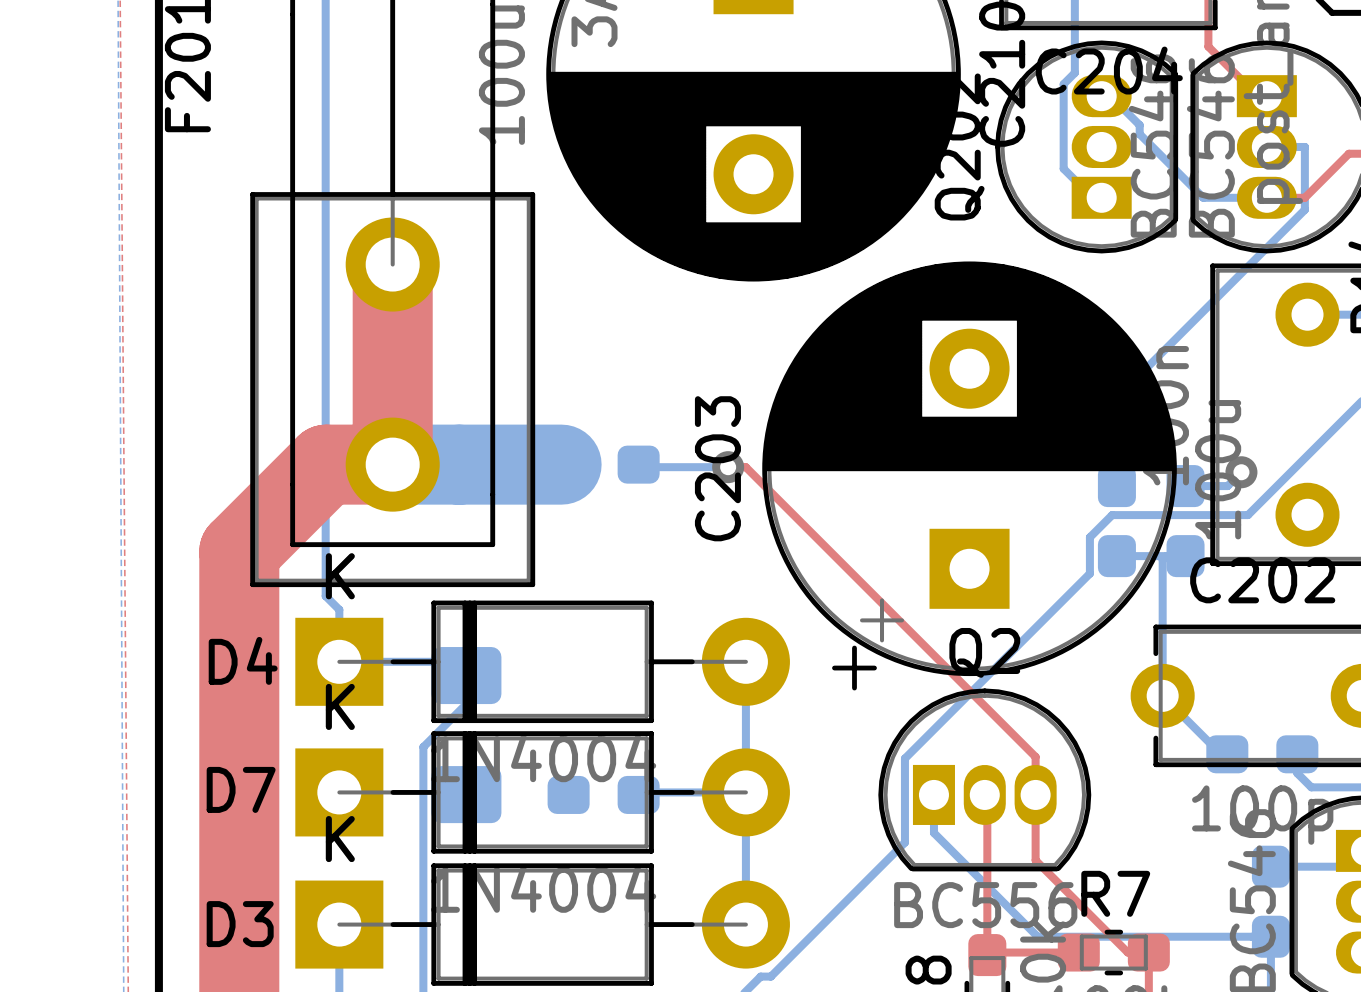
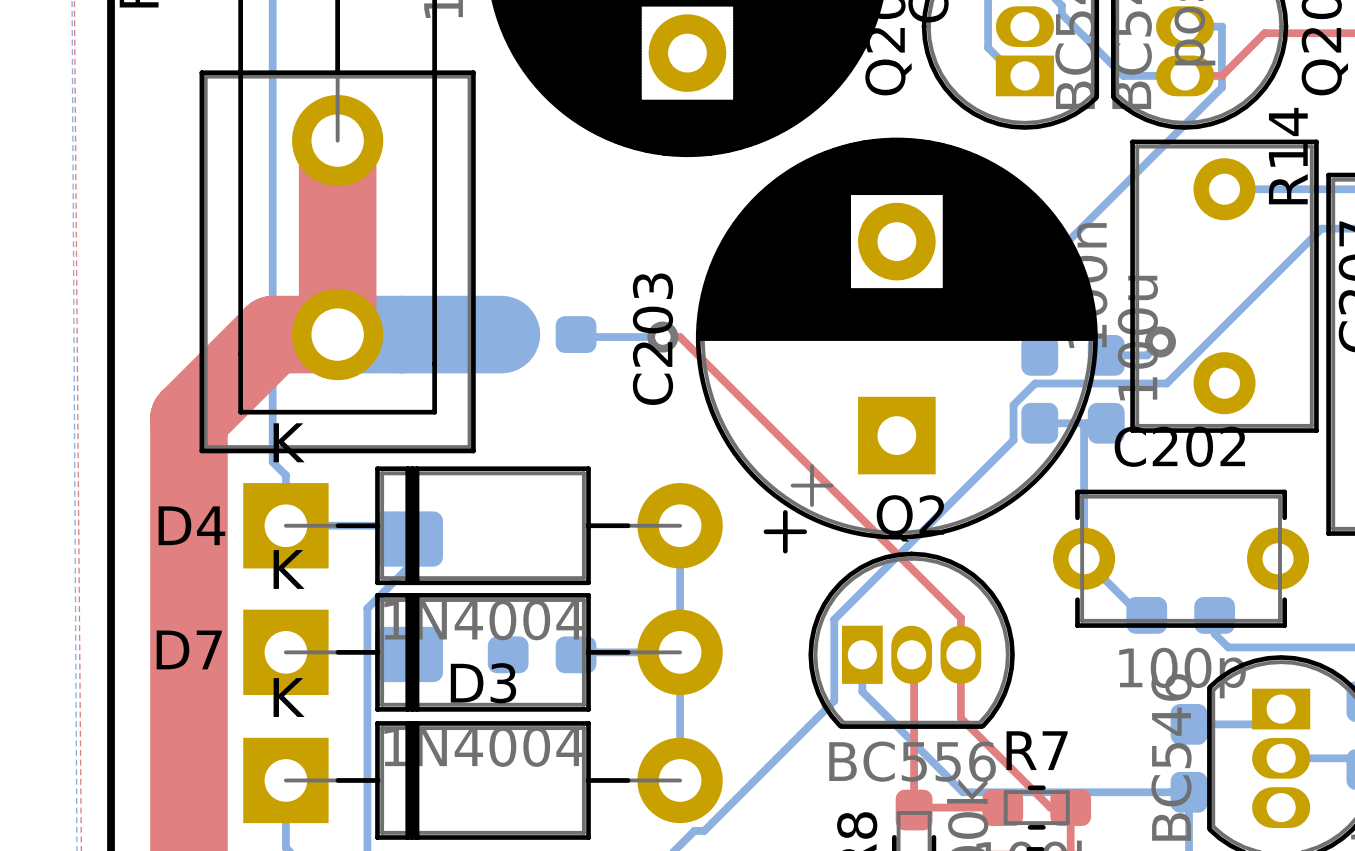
D3 name position: D3 (240, 924) -> D3 (483, 683)

